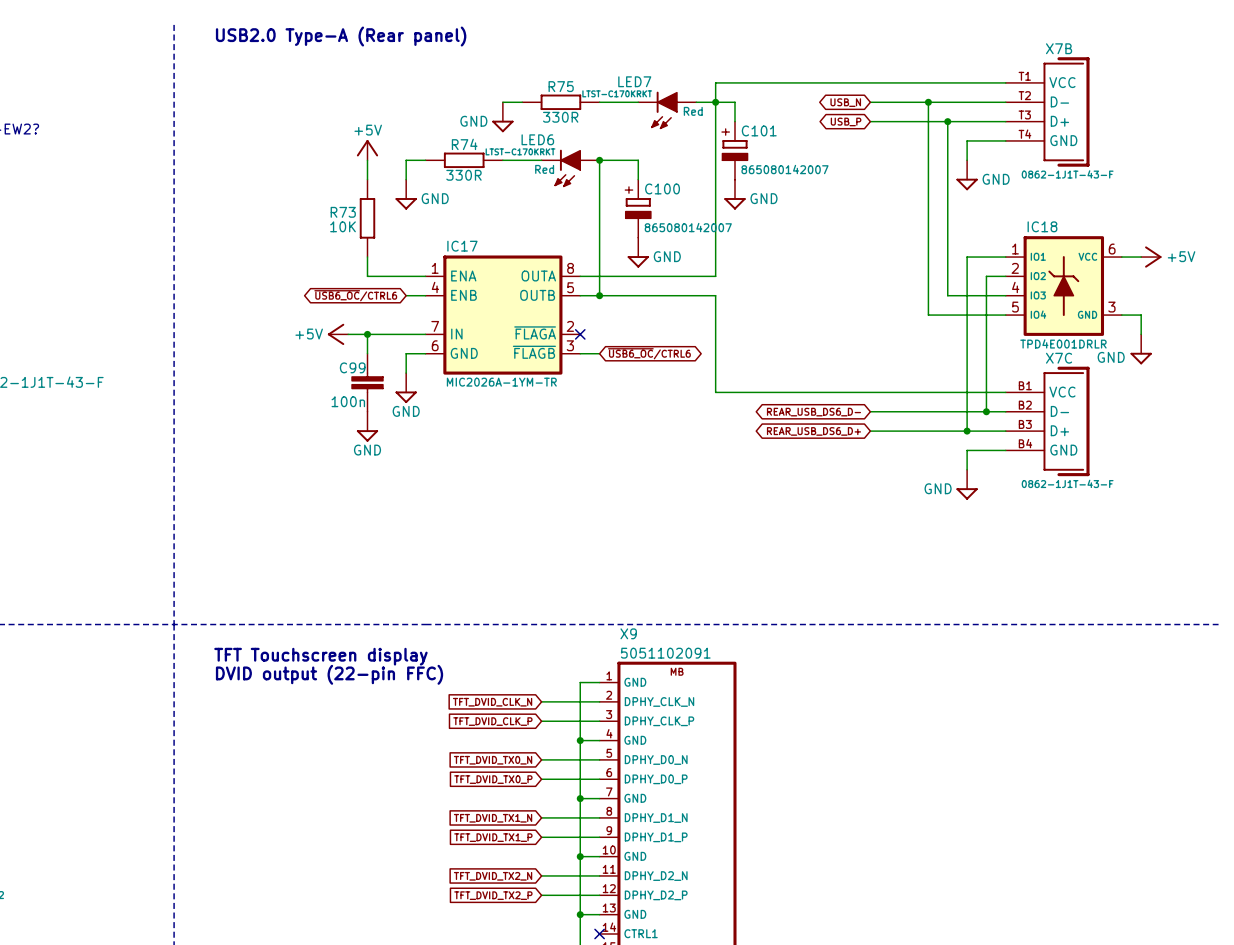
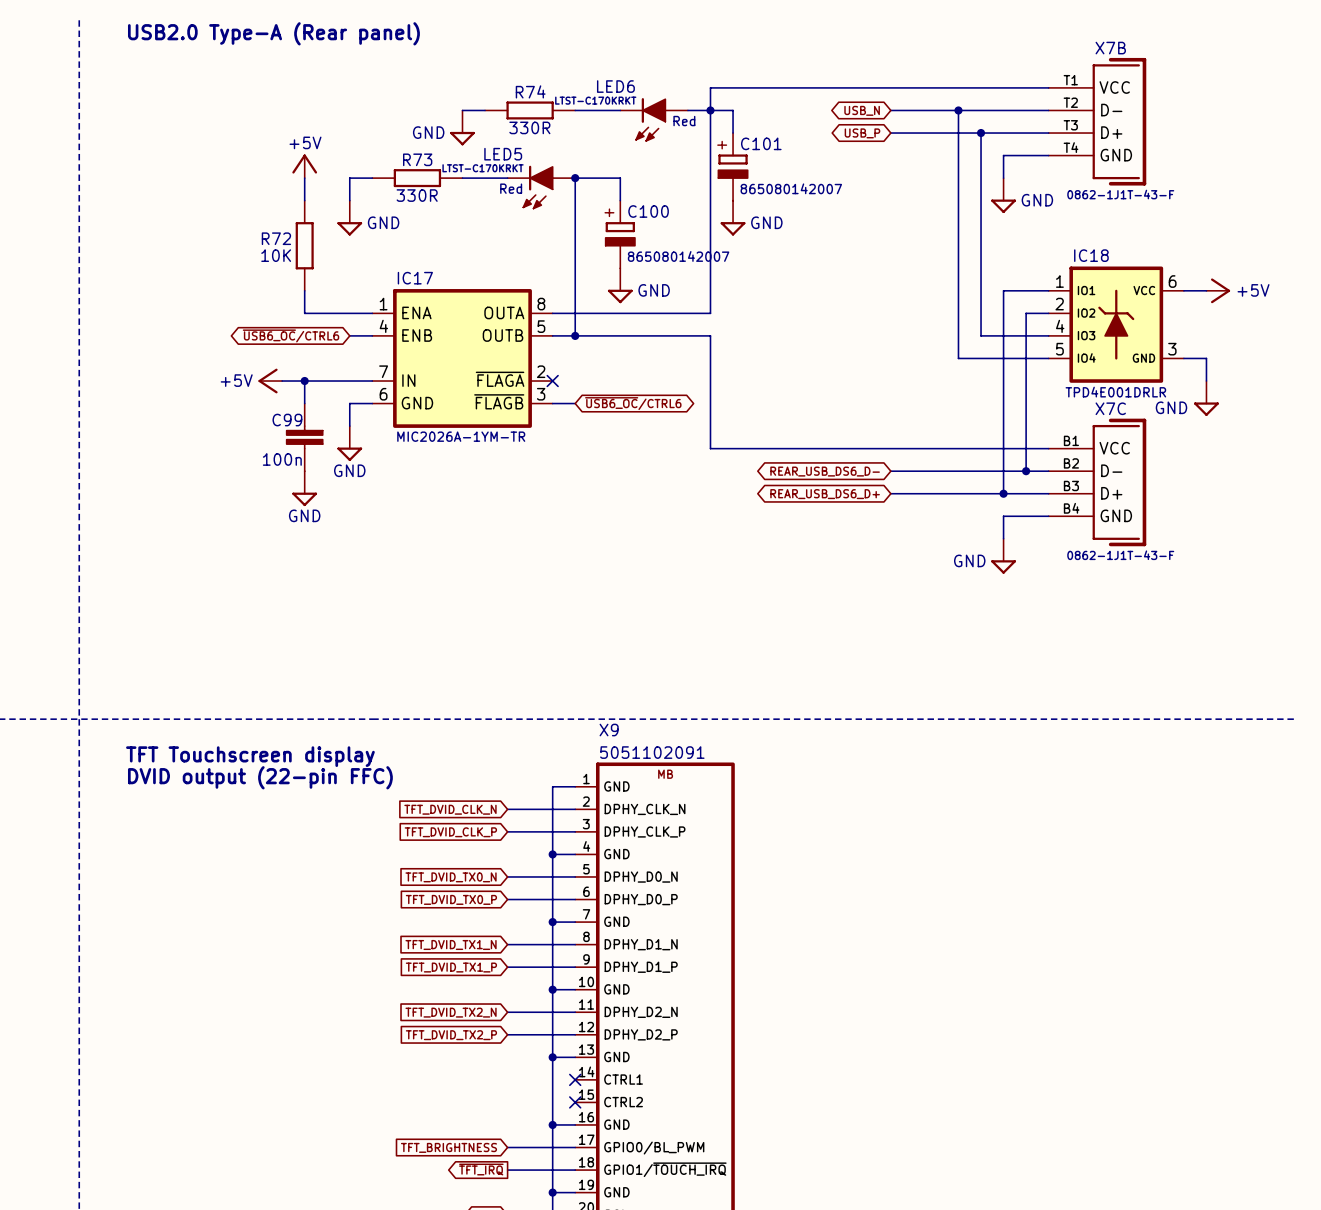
LED7 name: LED7 (634, 81) -> LED6 (615, 86)
R75 name: R75 (561, 86) -> R74 (530, 91)
LED6 name: LED6 (537, 139) -> LED5 (503, 154)
R74 name: R74 (464, 144) -> R73 (417, 159)
R73 name: R73 (343, 212) -> R72 (276, 238)

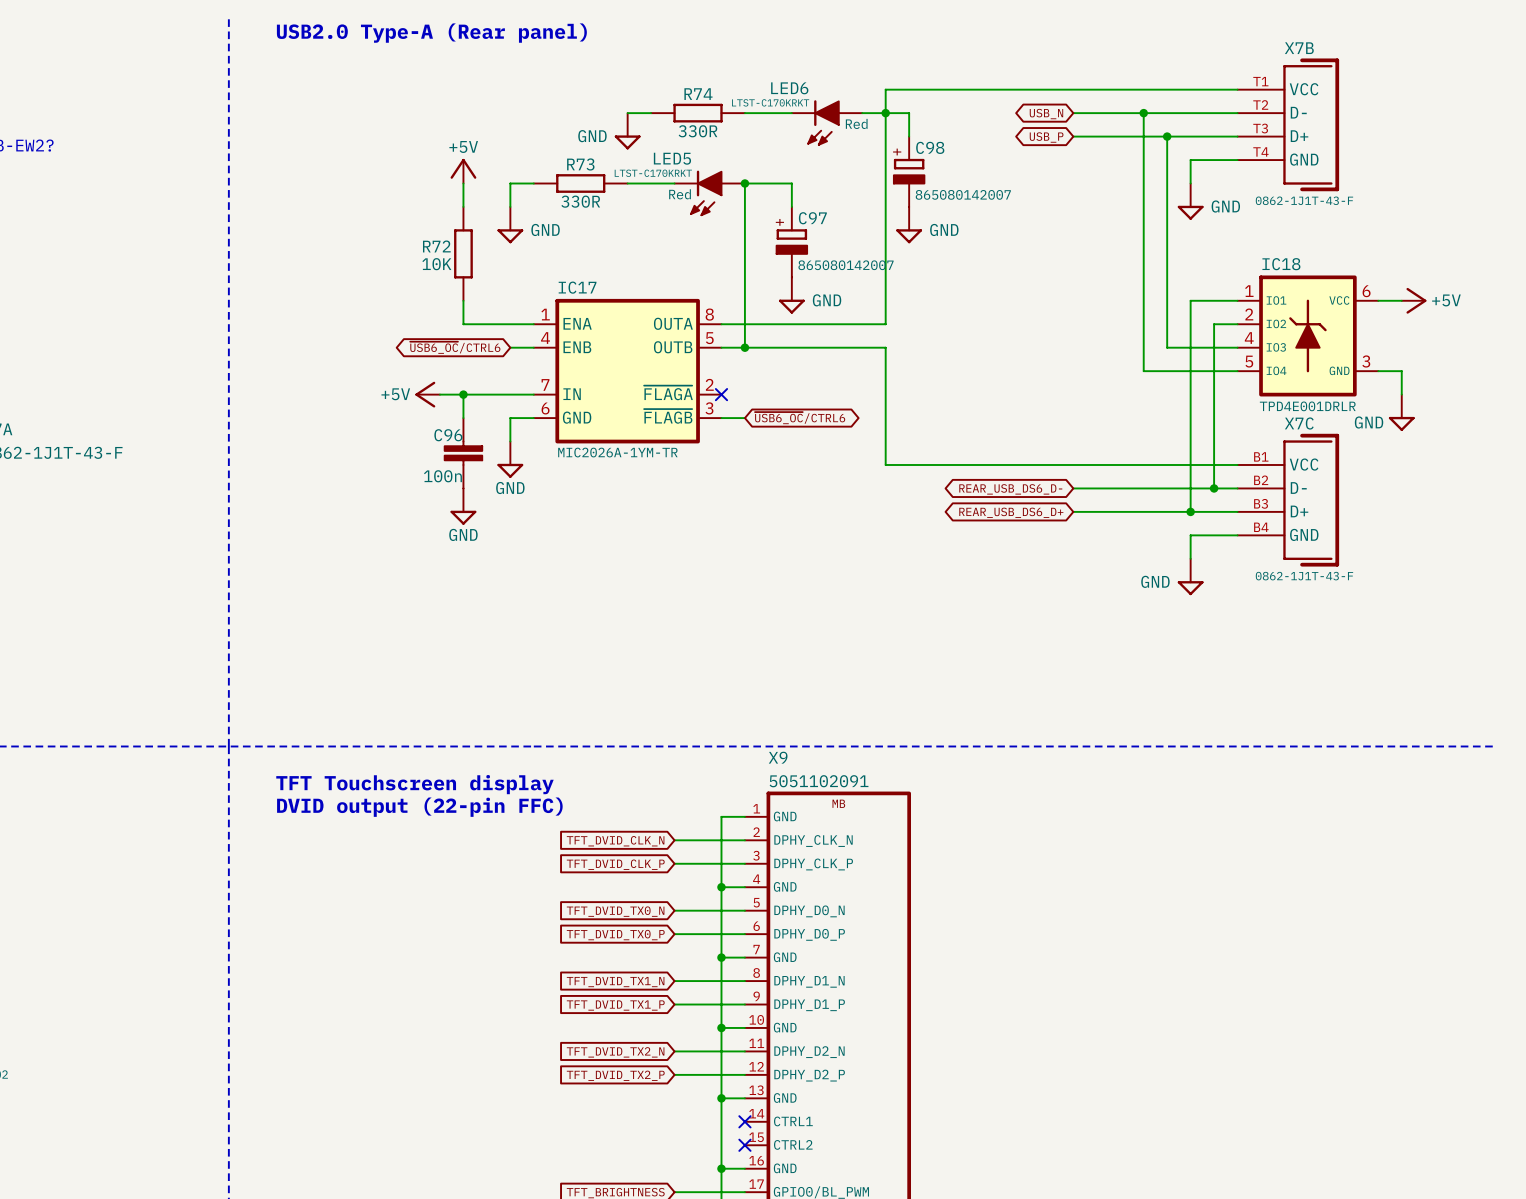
C101 name: C101 (761, 143) -> C98 (930, 147)
C100 name: C100 (648, 211) -> C97 (812, 218)
C99 name: C99 (287, 420) -> C96 (448, 435)

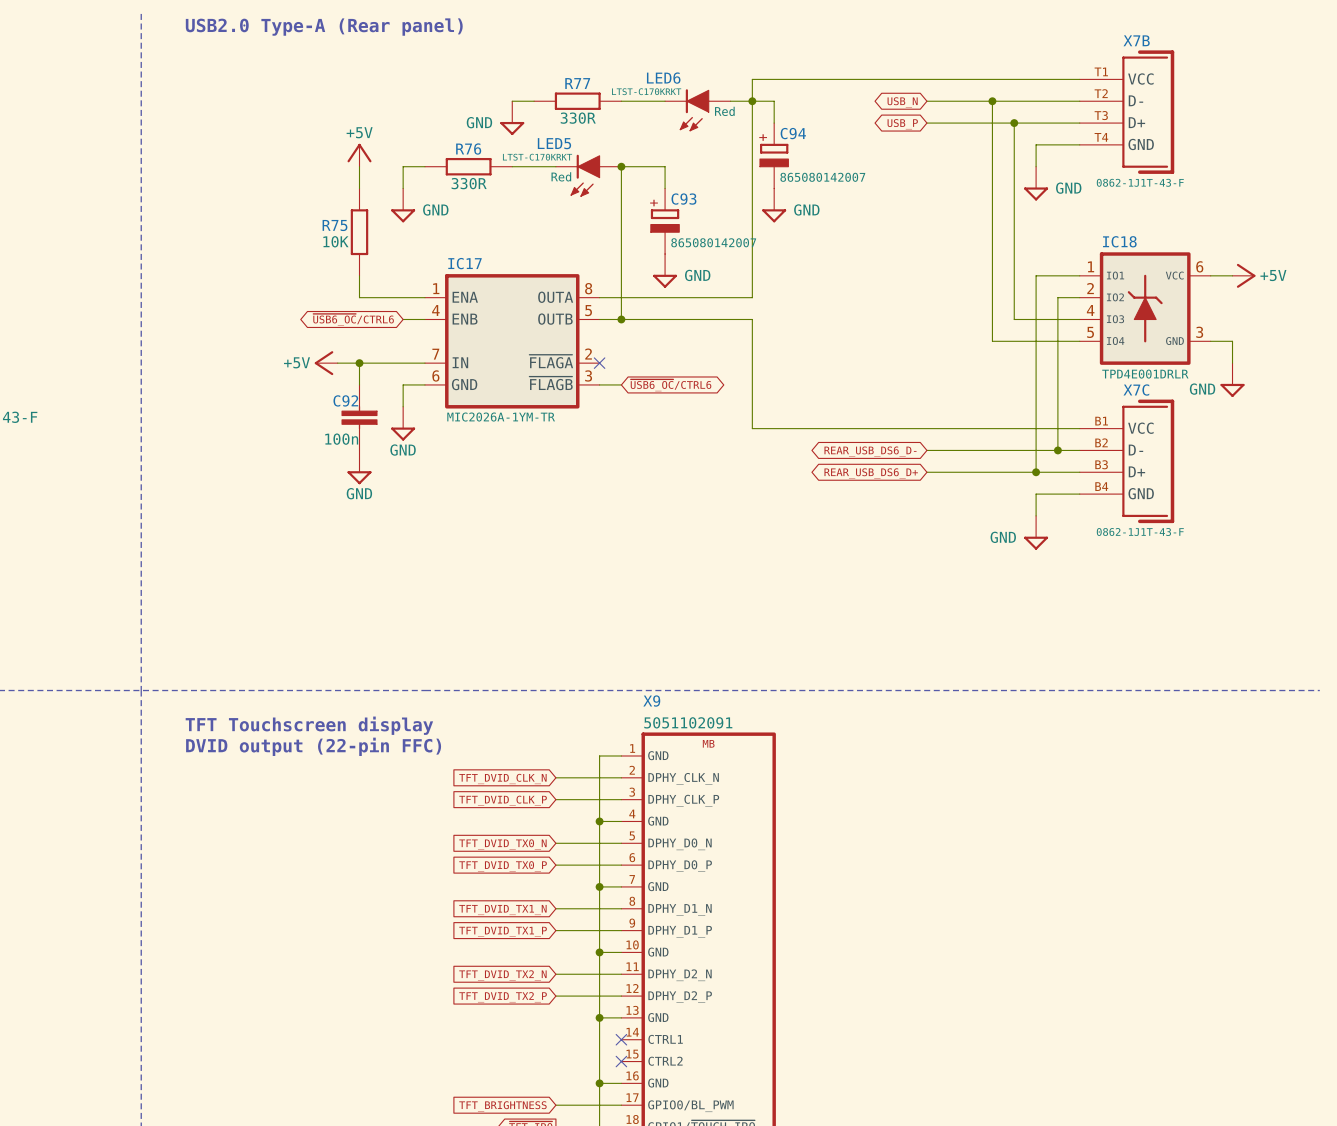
R74 name: R74 (698, 94) -> R77 (577, 83)
C98 name: C98 (930, 147) -> C94 (793, 133)
R73 name: R73 (580, 164) -> R76 (468, 149)
C97 name: C97 (812, 218) -> C93 (683, 199)
R72 name: R72 (436, 246) -> R75 (334, 225)
C96 name: C96 (448, 435) -> C92 (345, 400)

